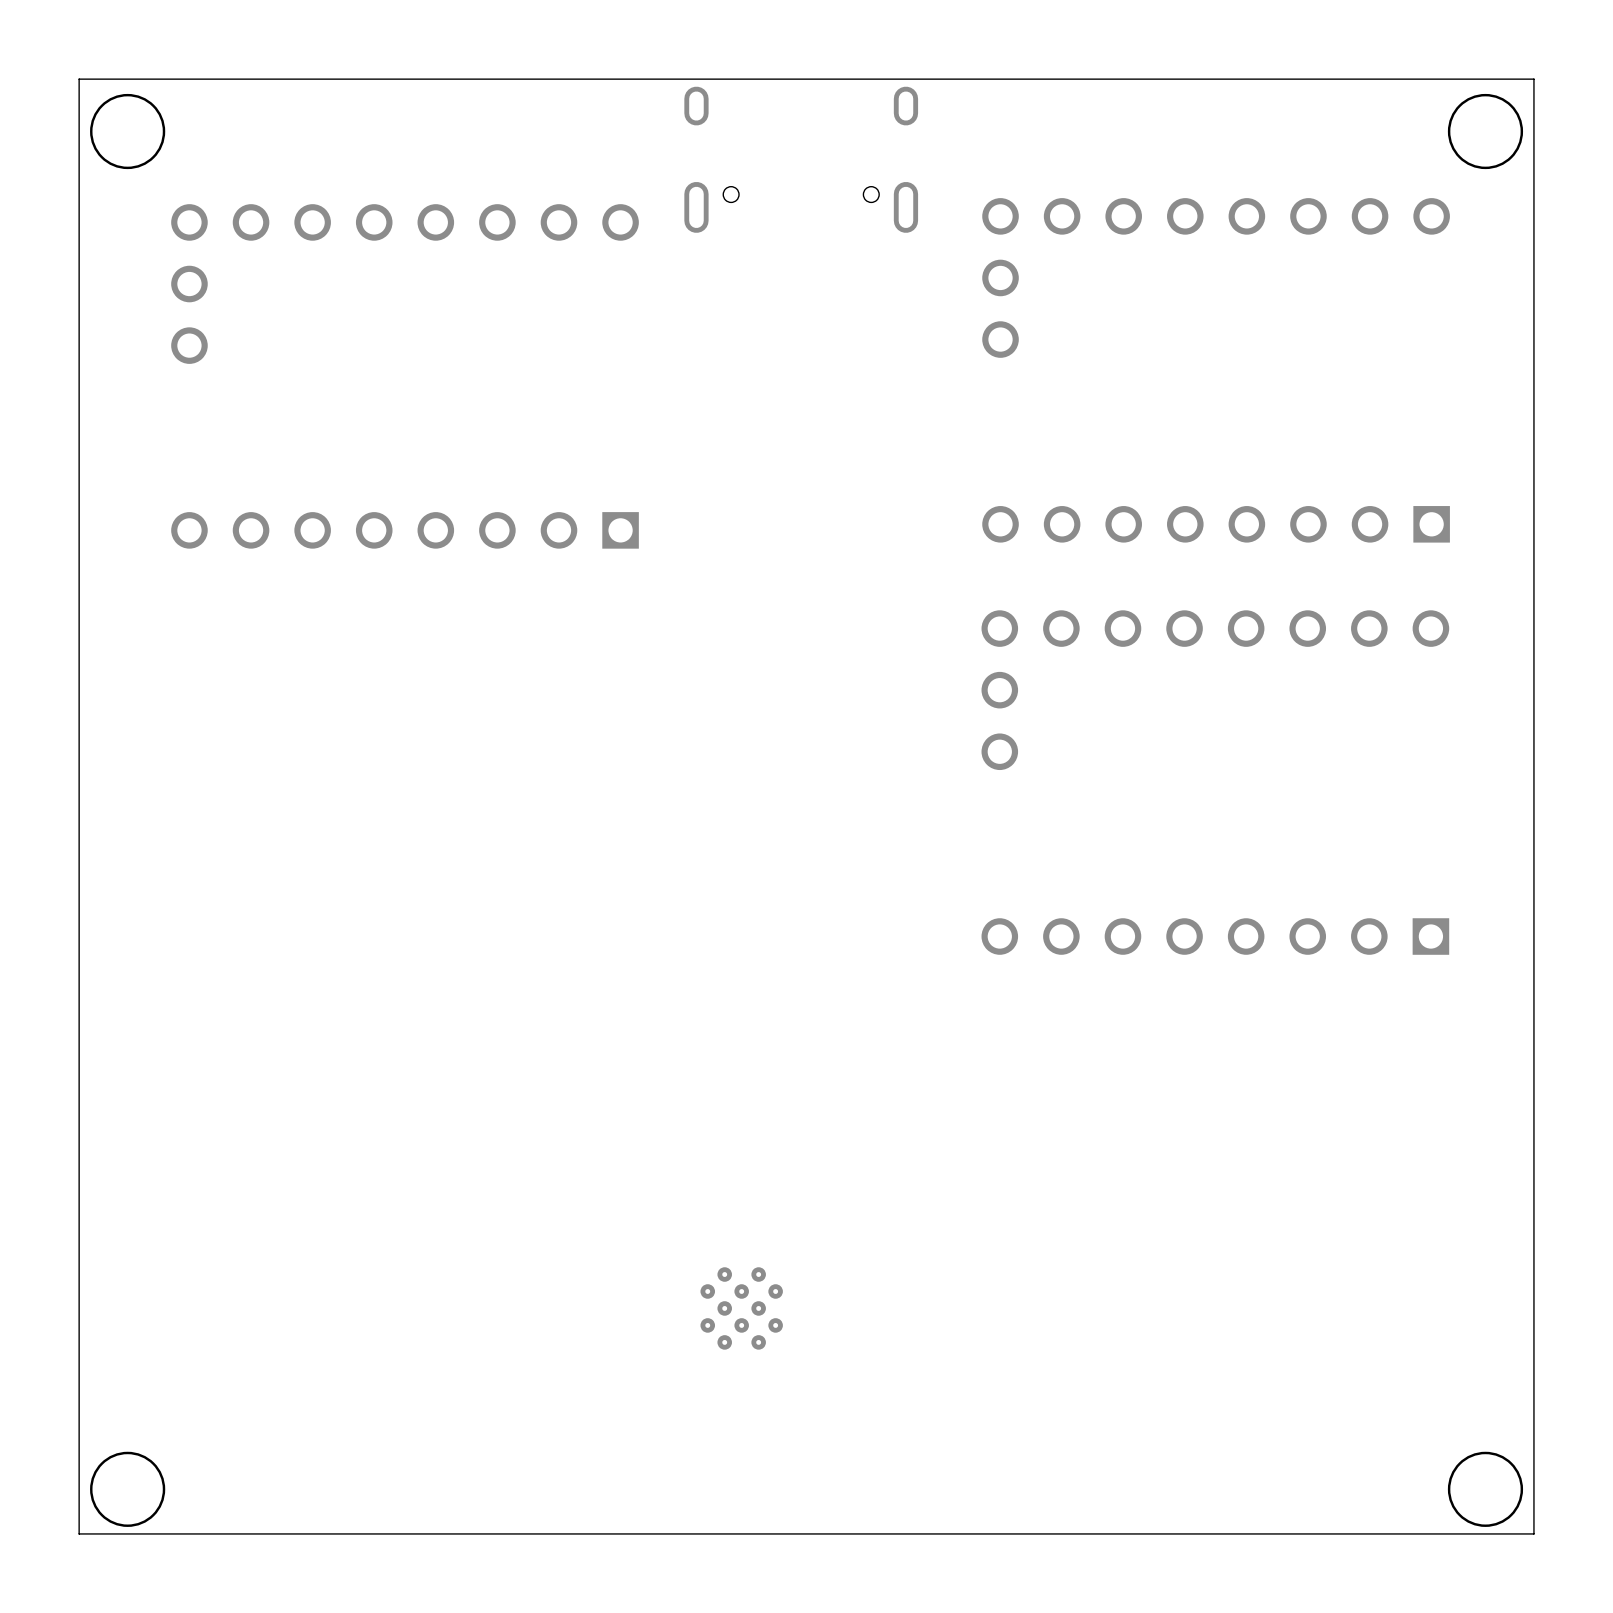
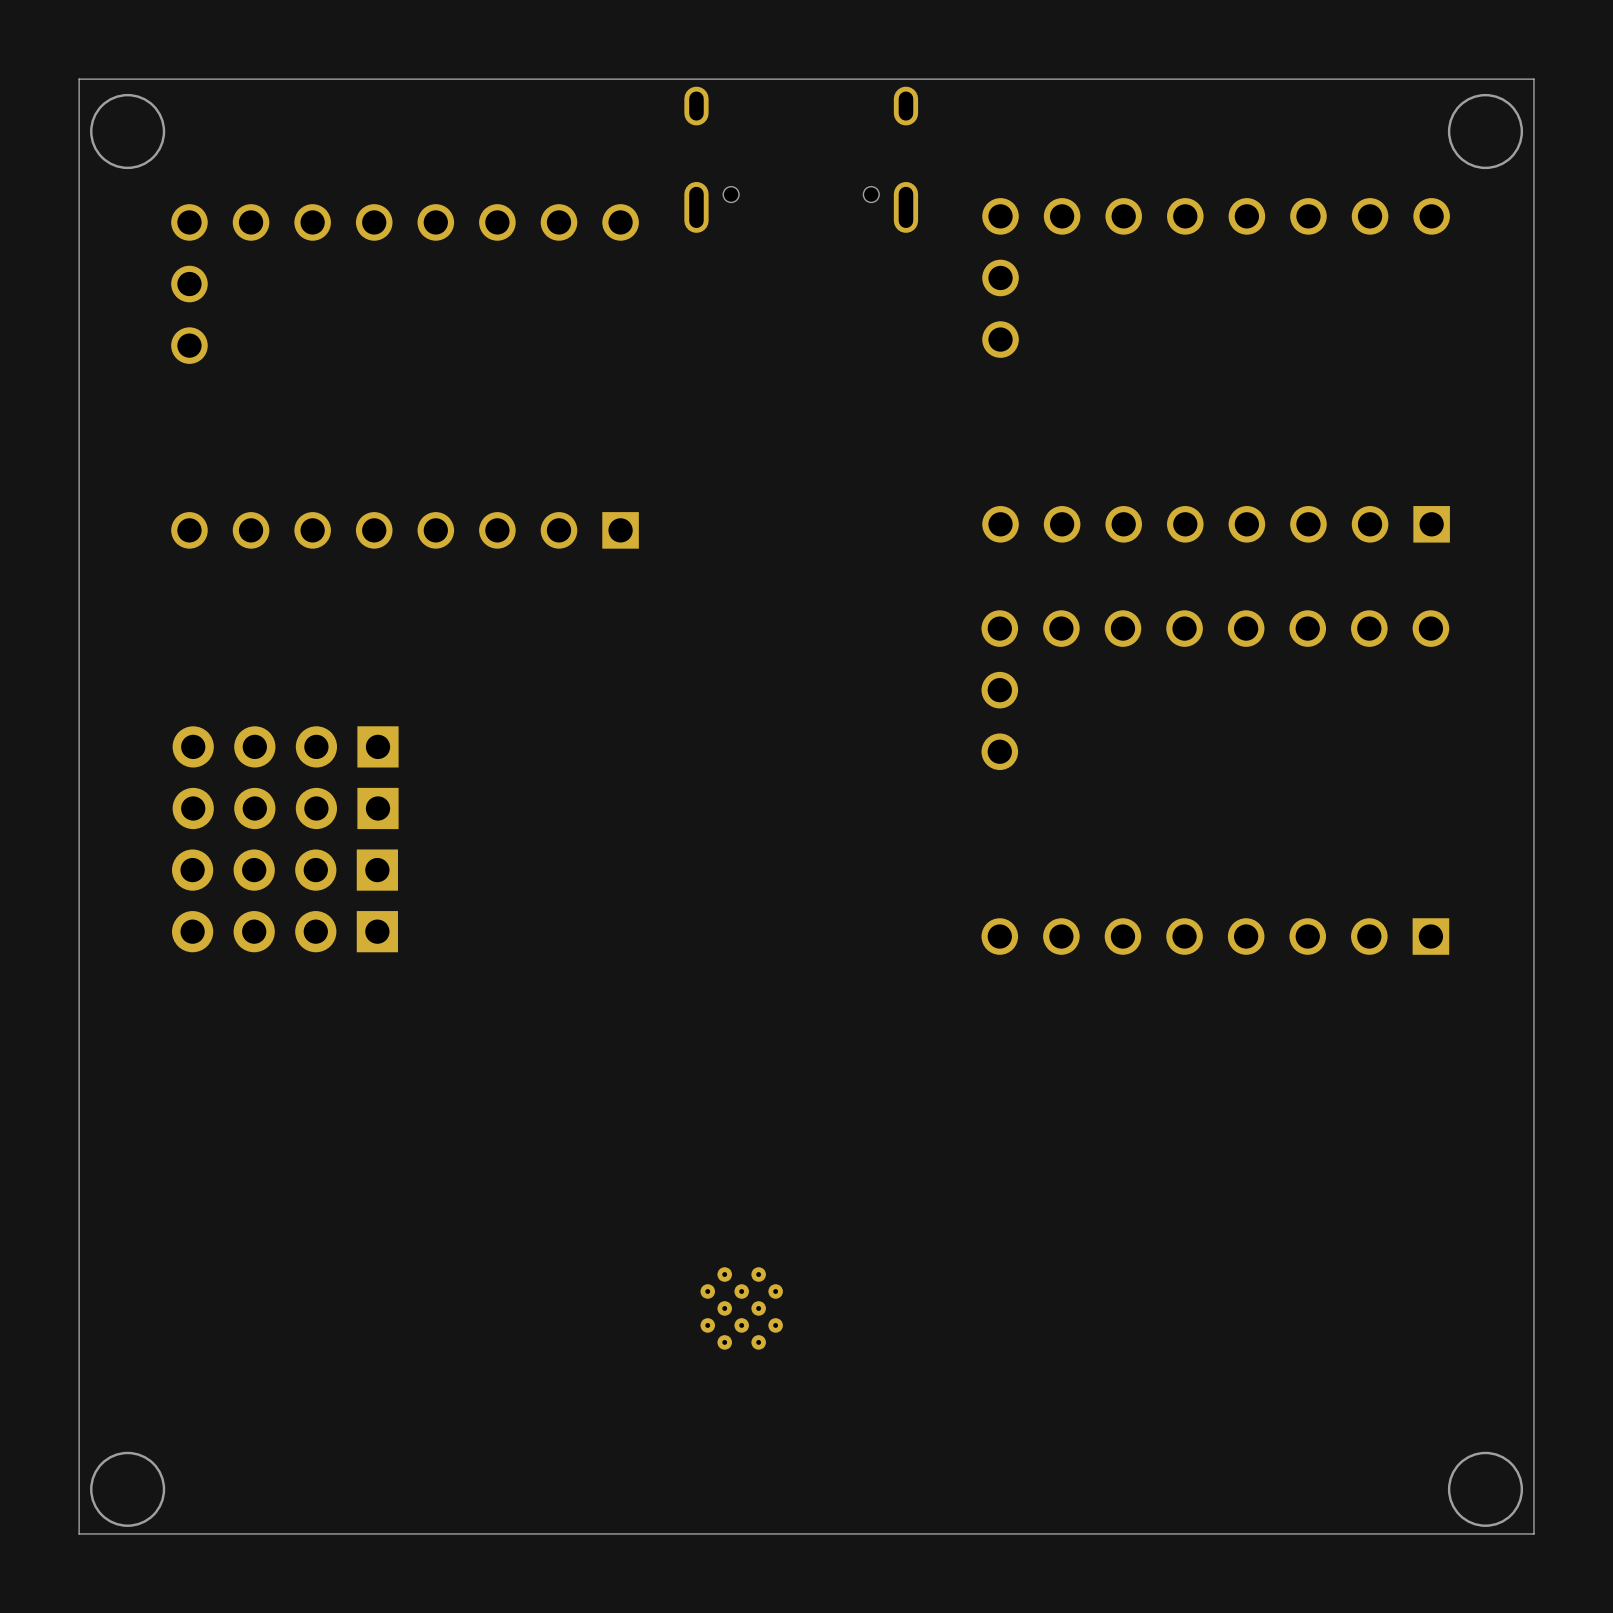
part: none -> (285, 746)
part: none -> (285, 808)
part: none -> (284, 870)
part: none -> (284, 931)

